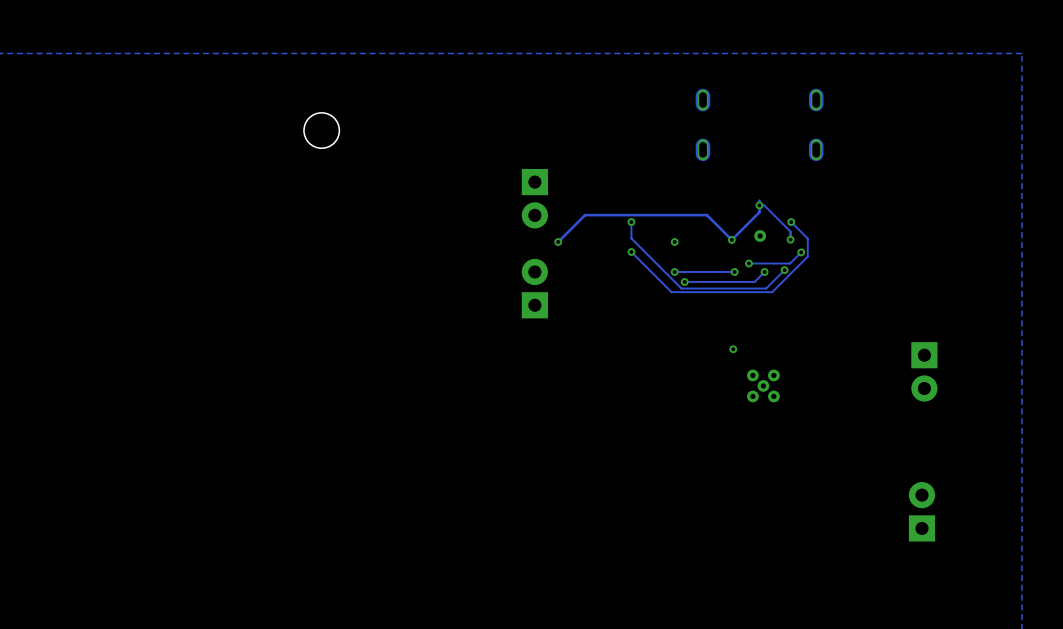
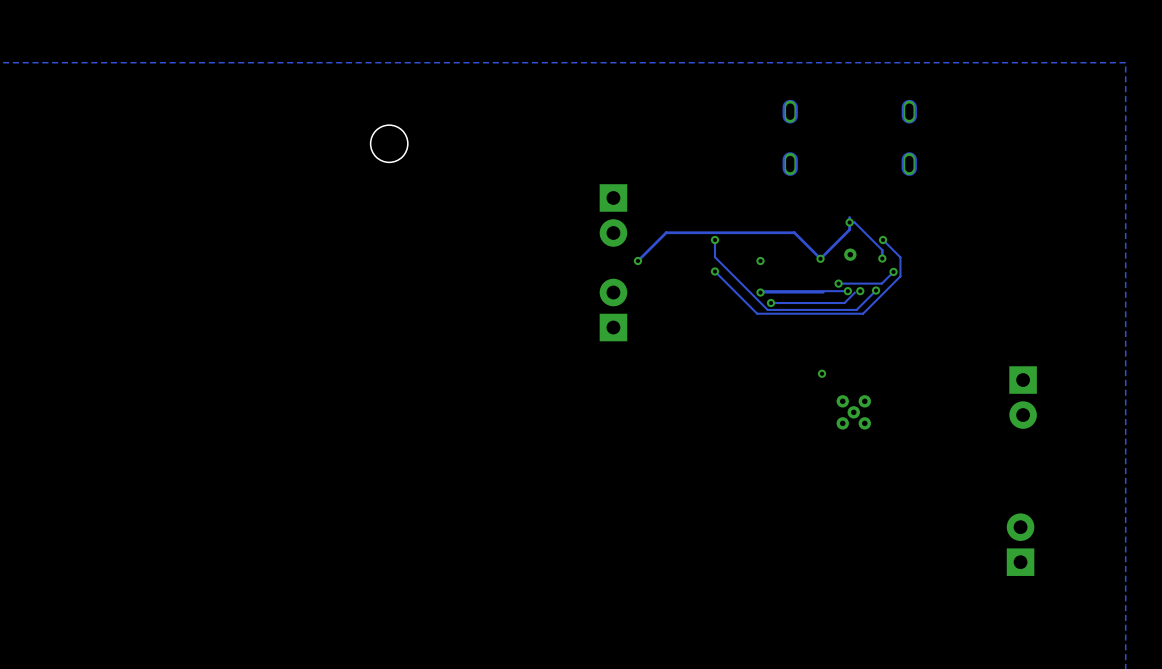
track: none -> (847, 291) (761, 291)
via: none -> (847, 291)
via: none -> (860, 291)
via: (734, 271) -> none
via: (764, 271) -> none

